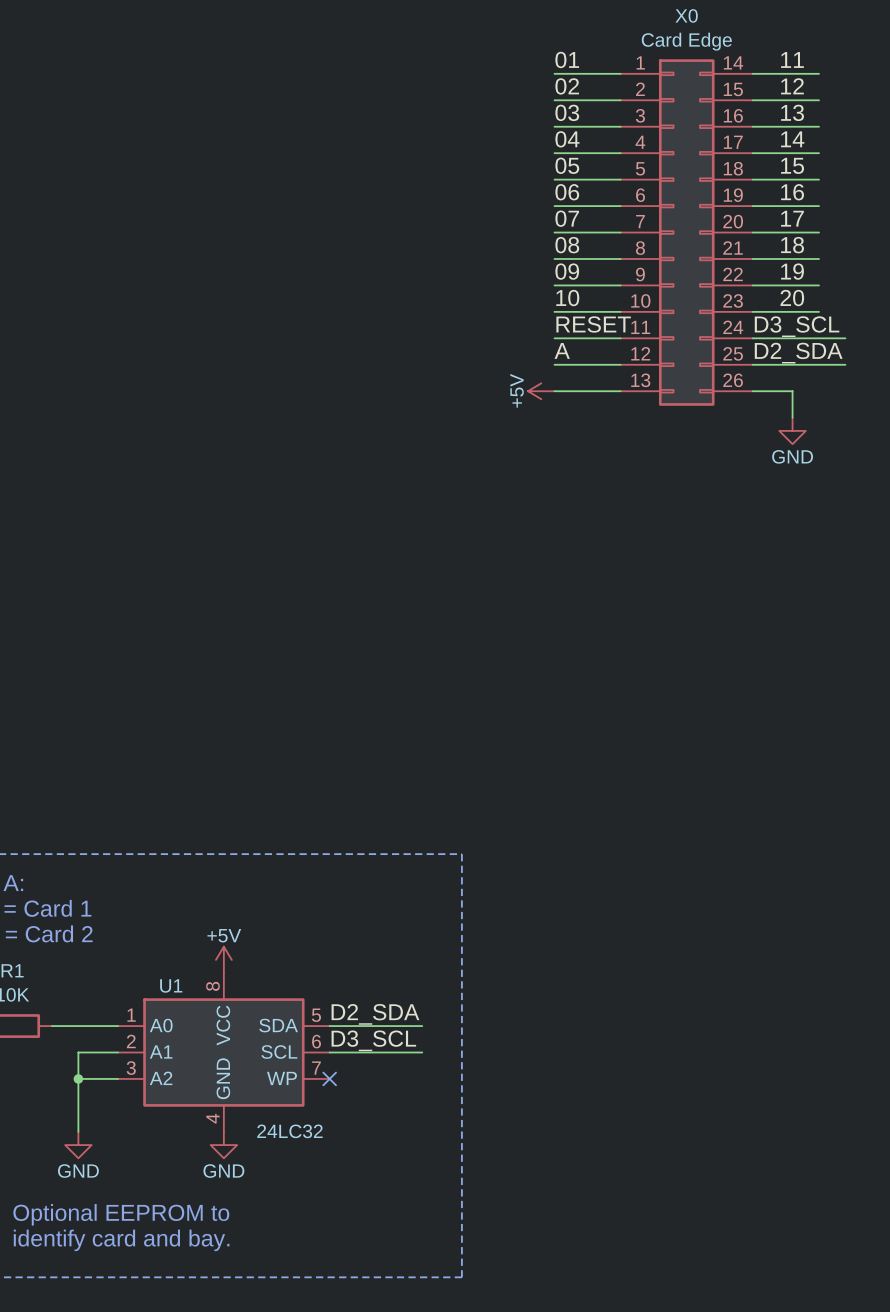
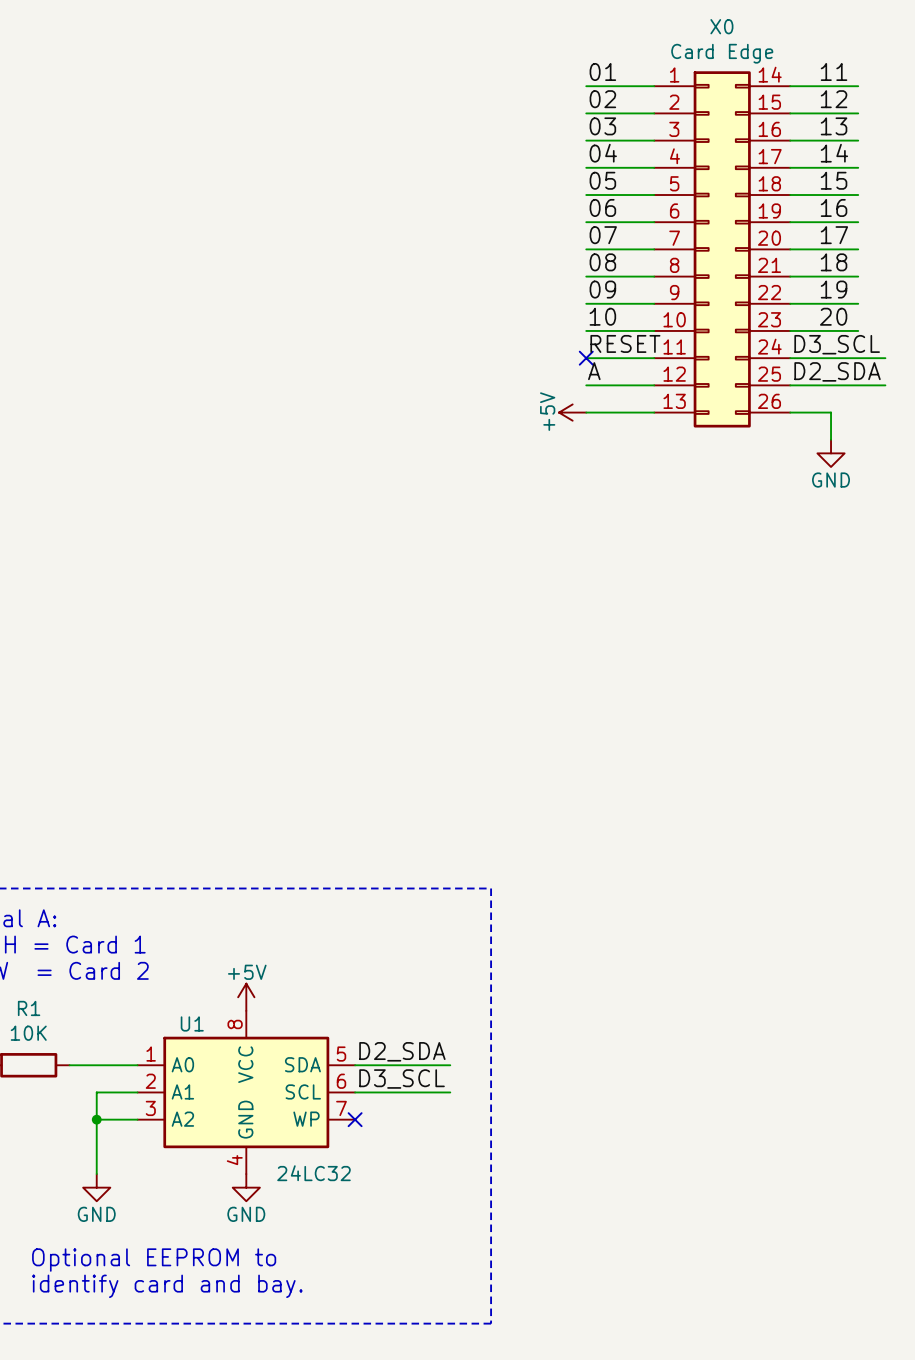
no-connect mark: none -> (586, 358)

